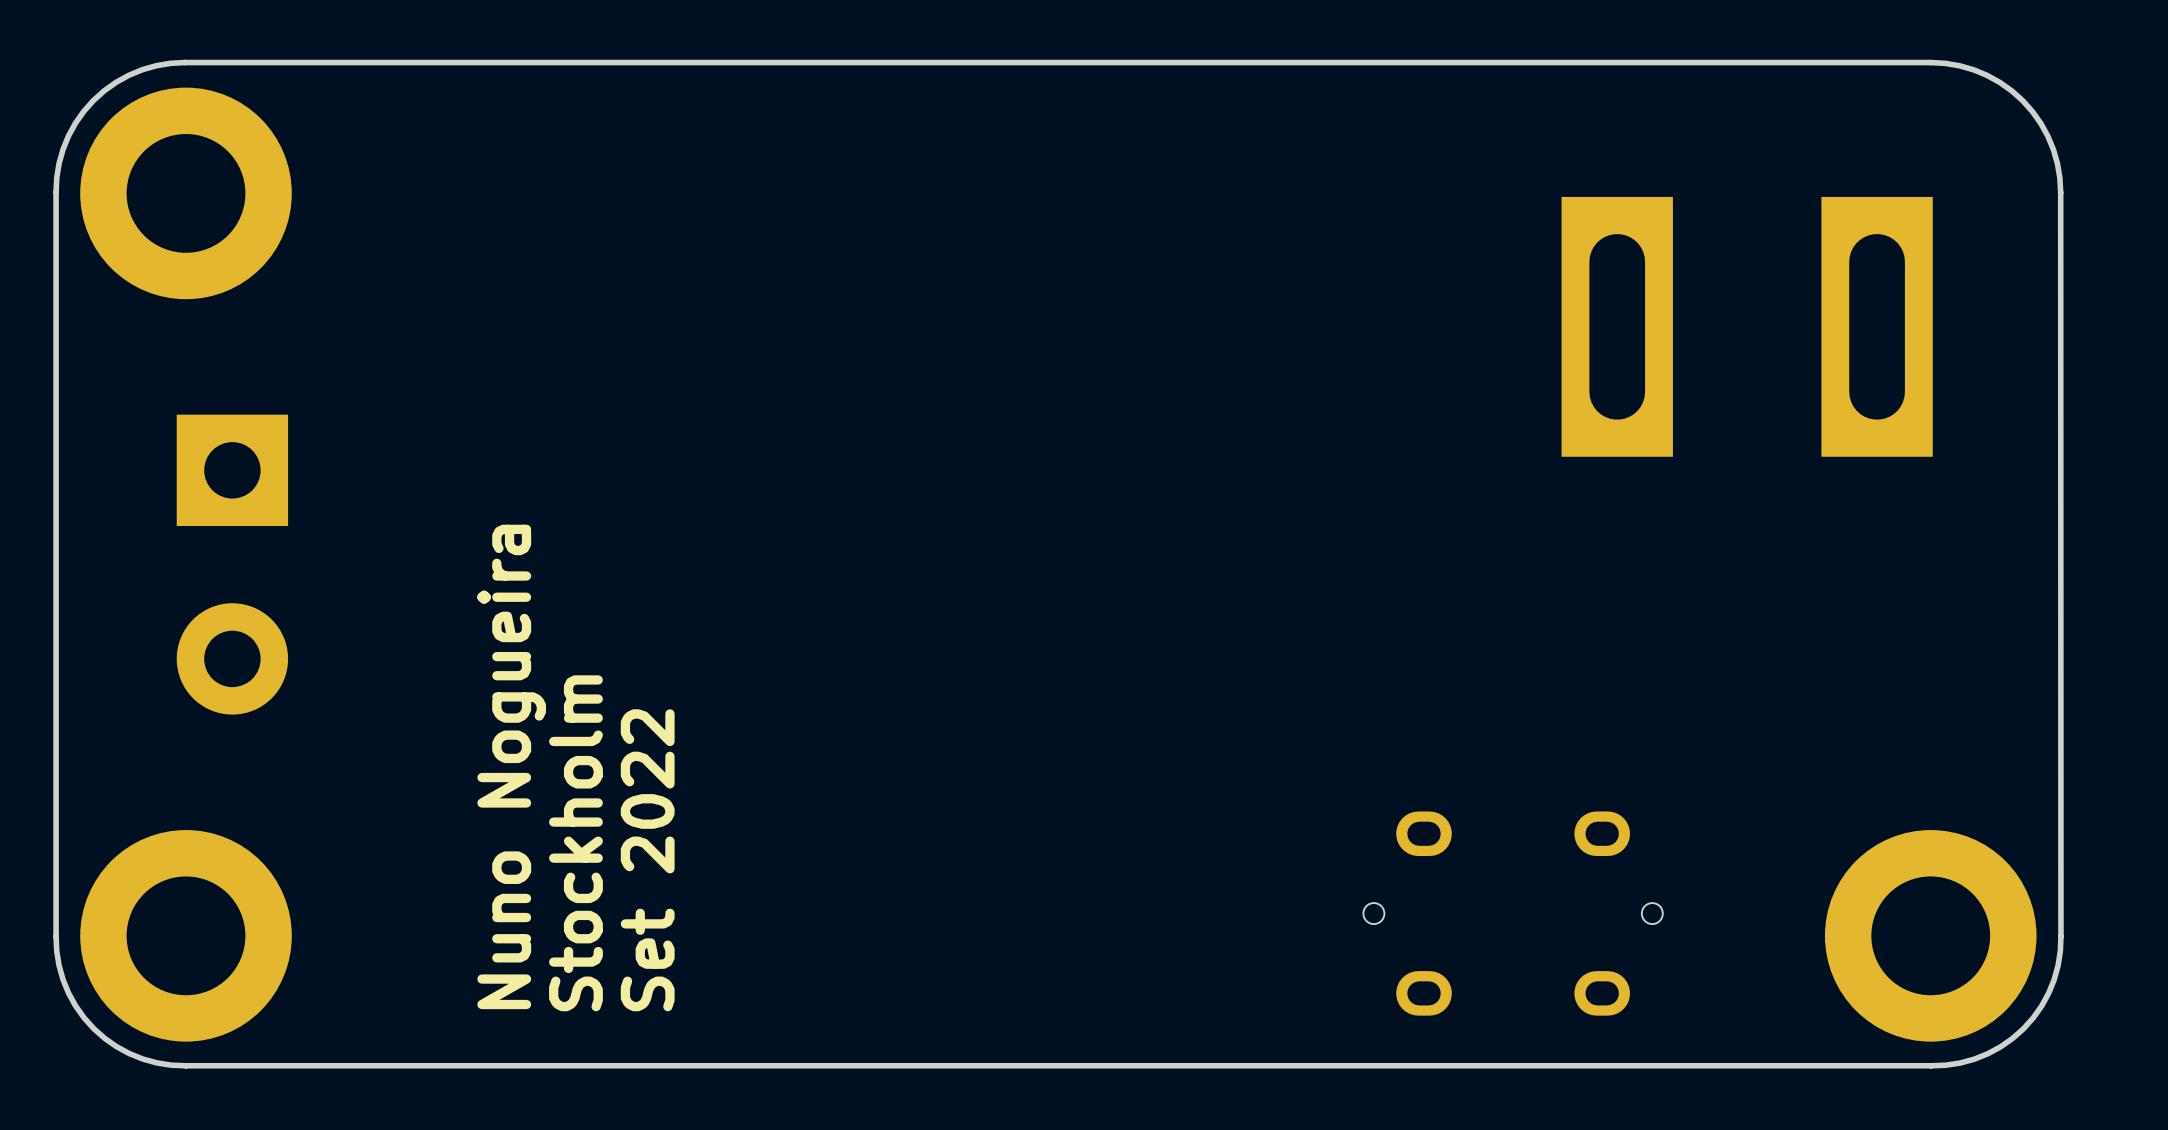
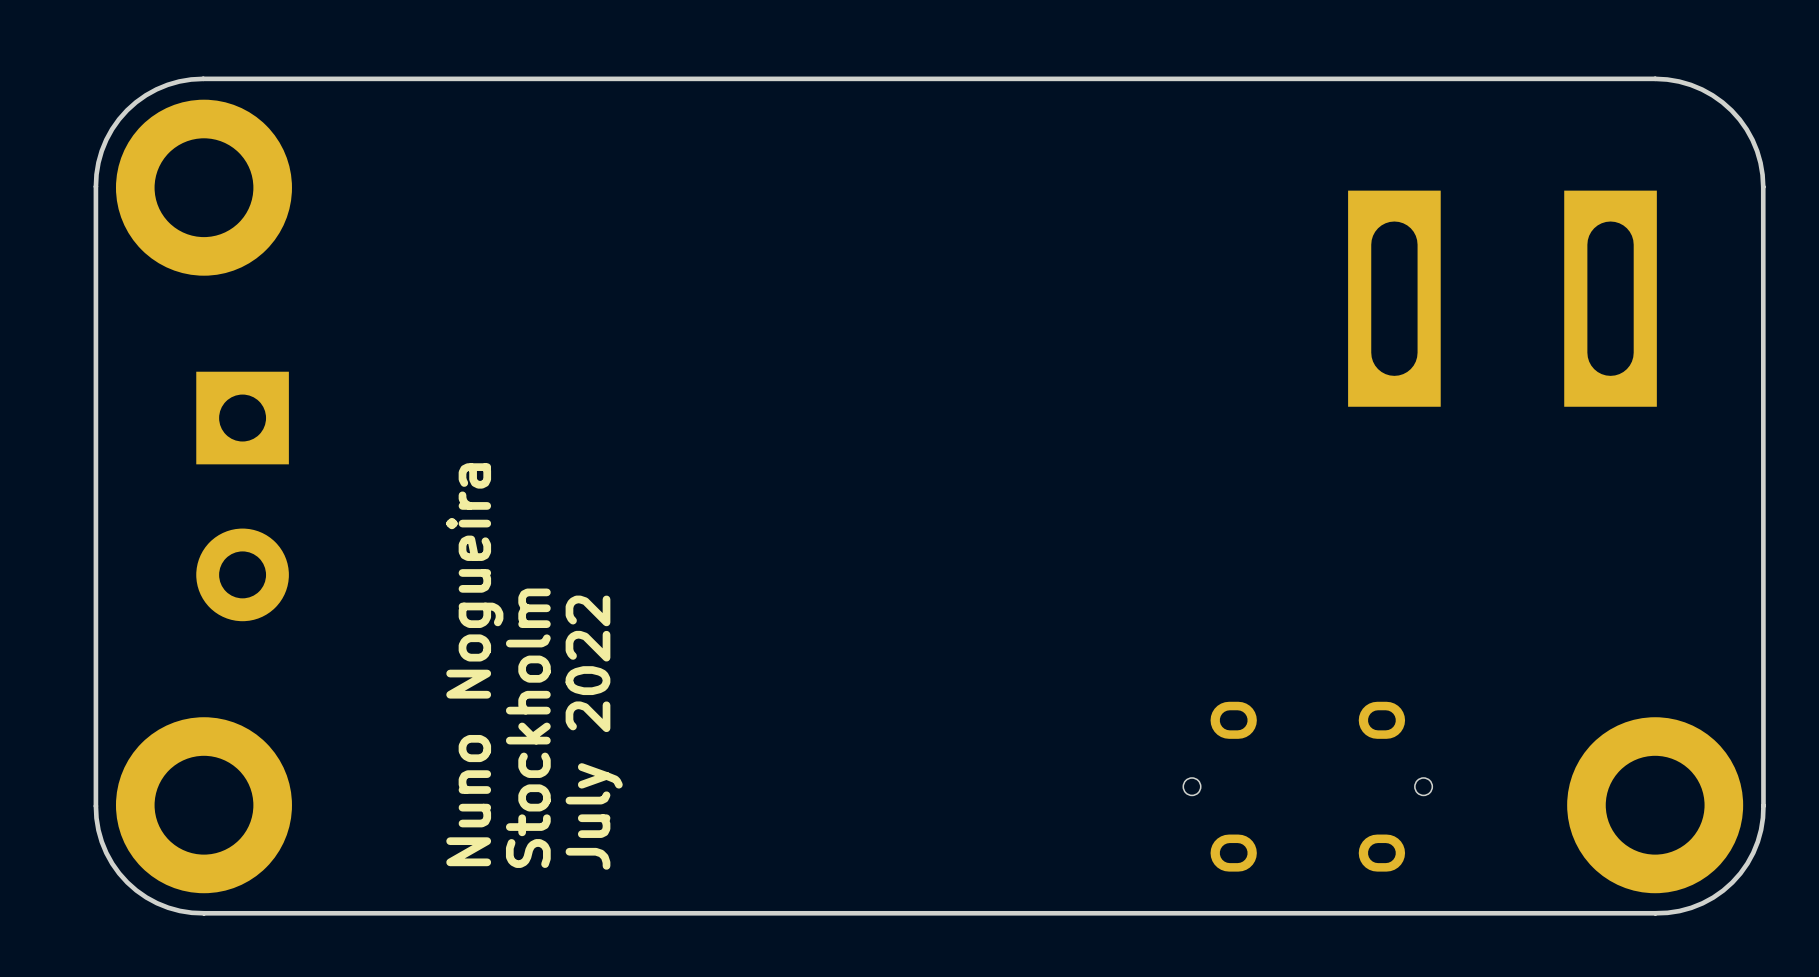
text: Set 2022 (647, 860) -> July 2022 (594, 732)

